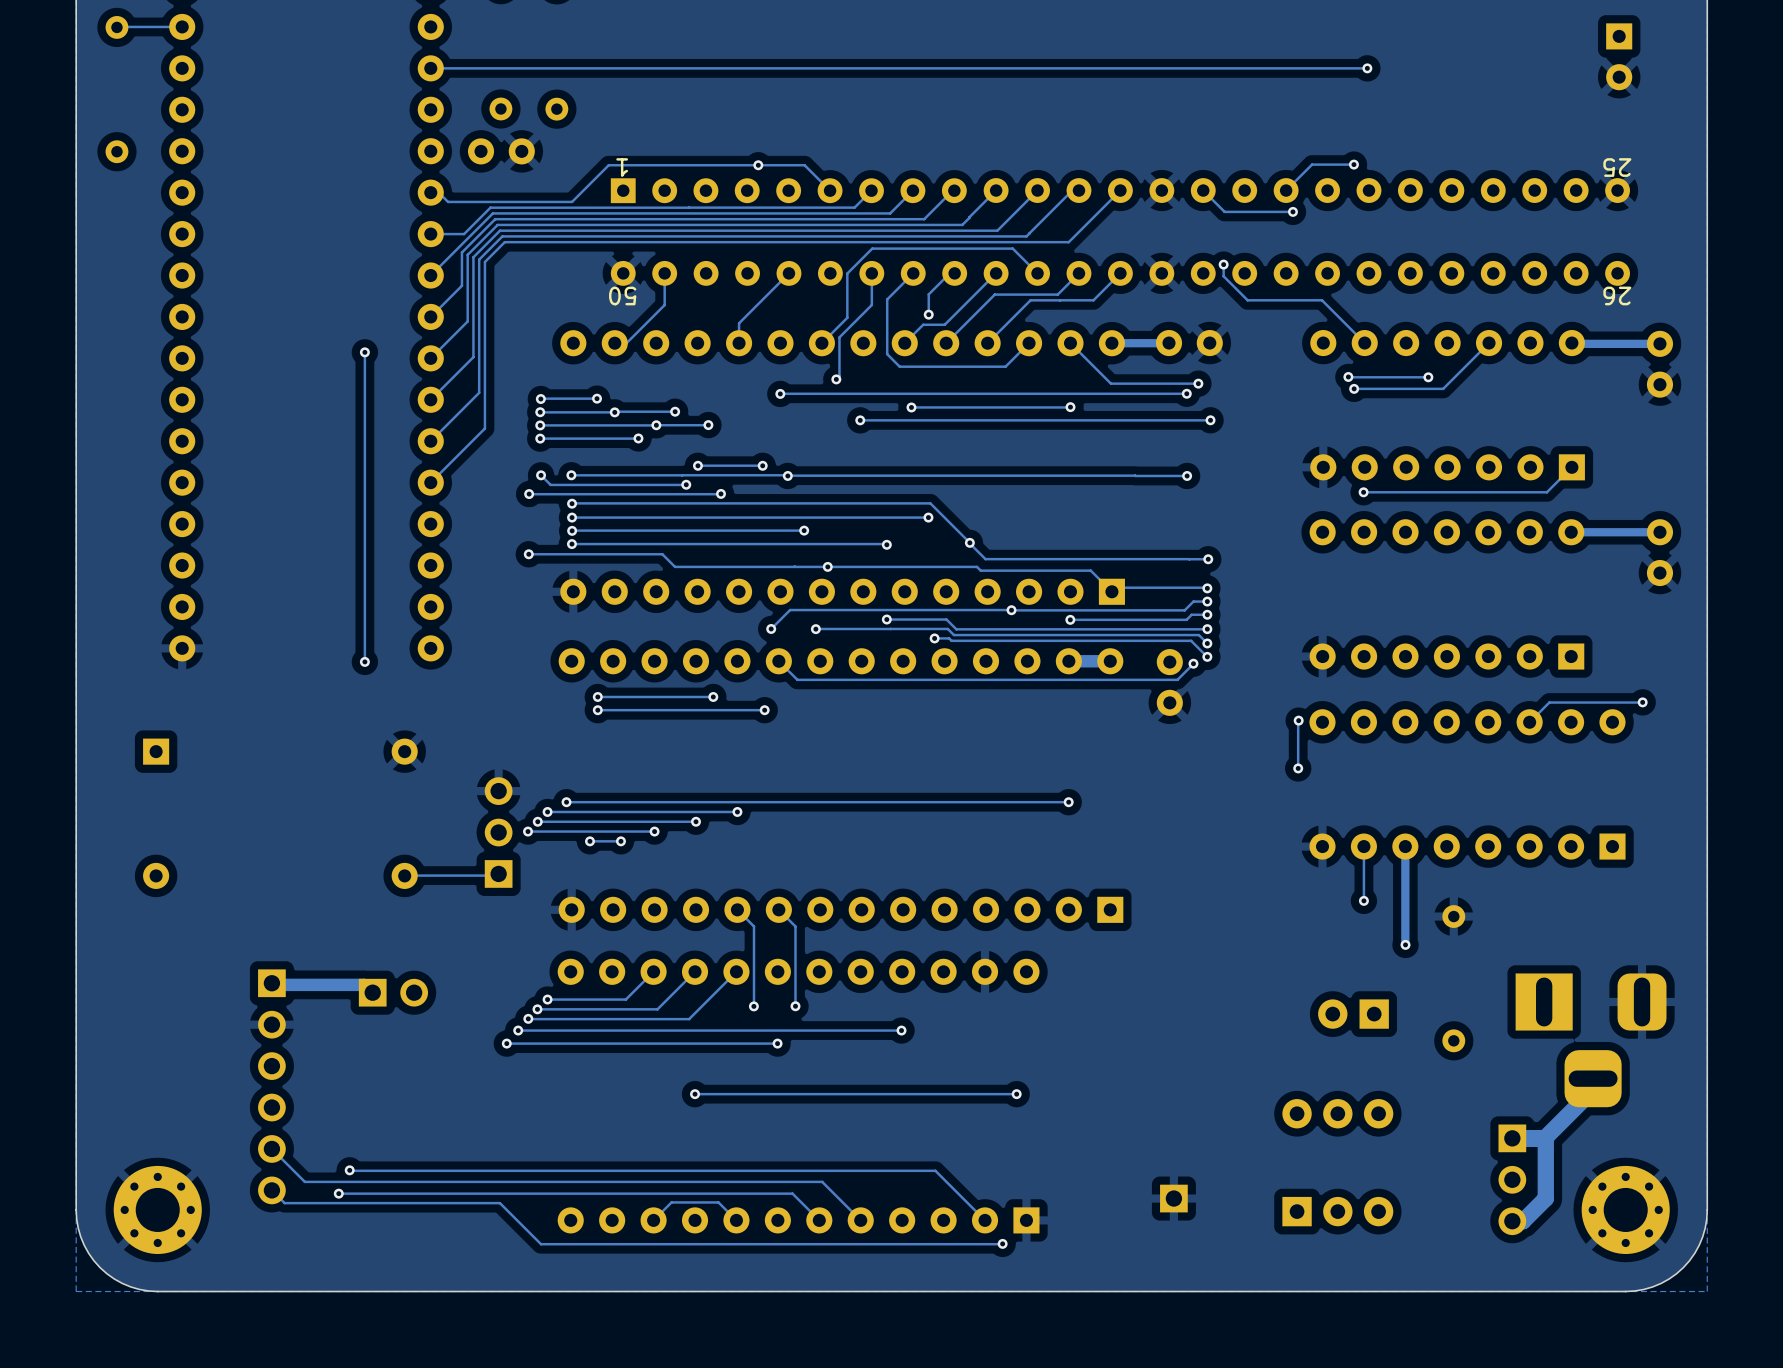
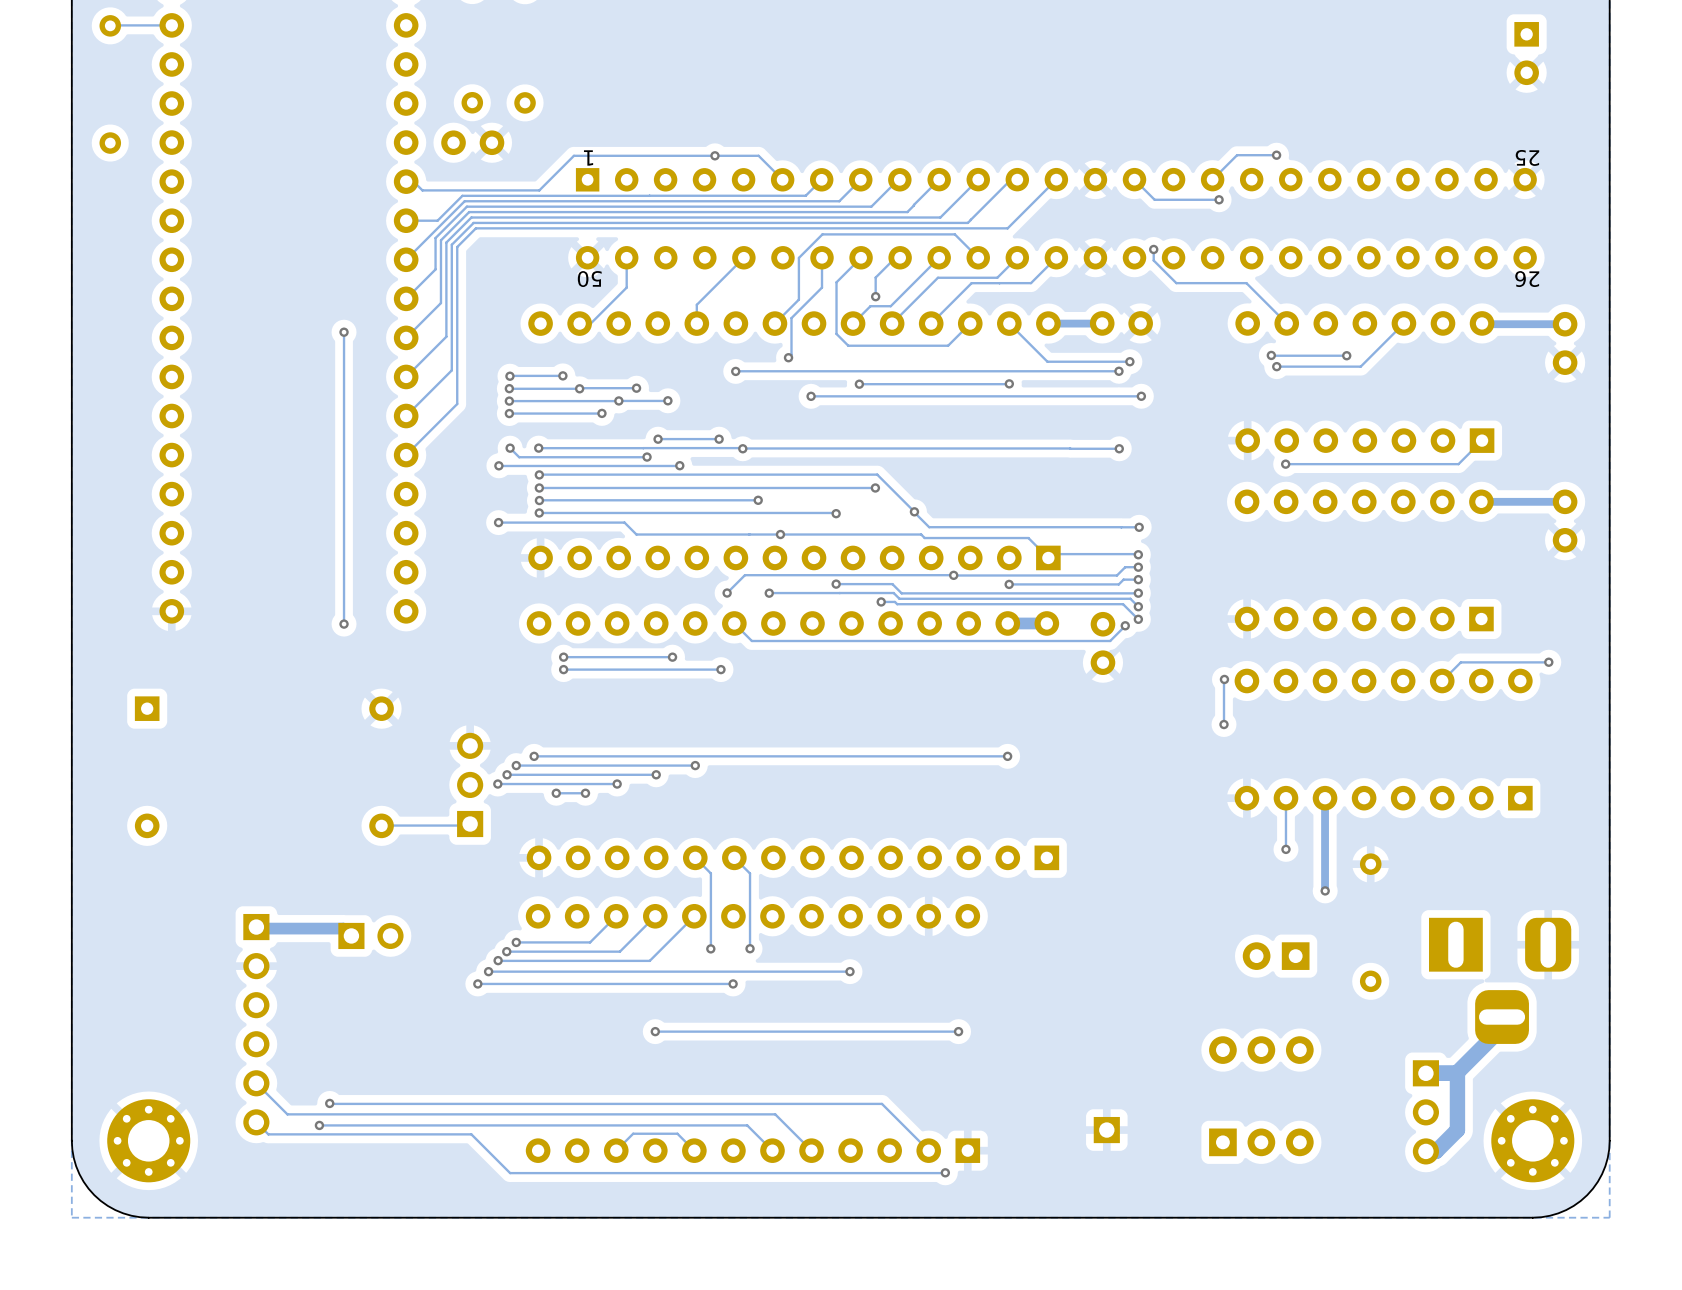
track: (1367, 68) (430, 68) -> none
via: (1367, 68) -> none

